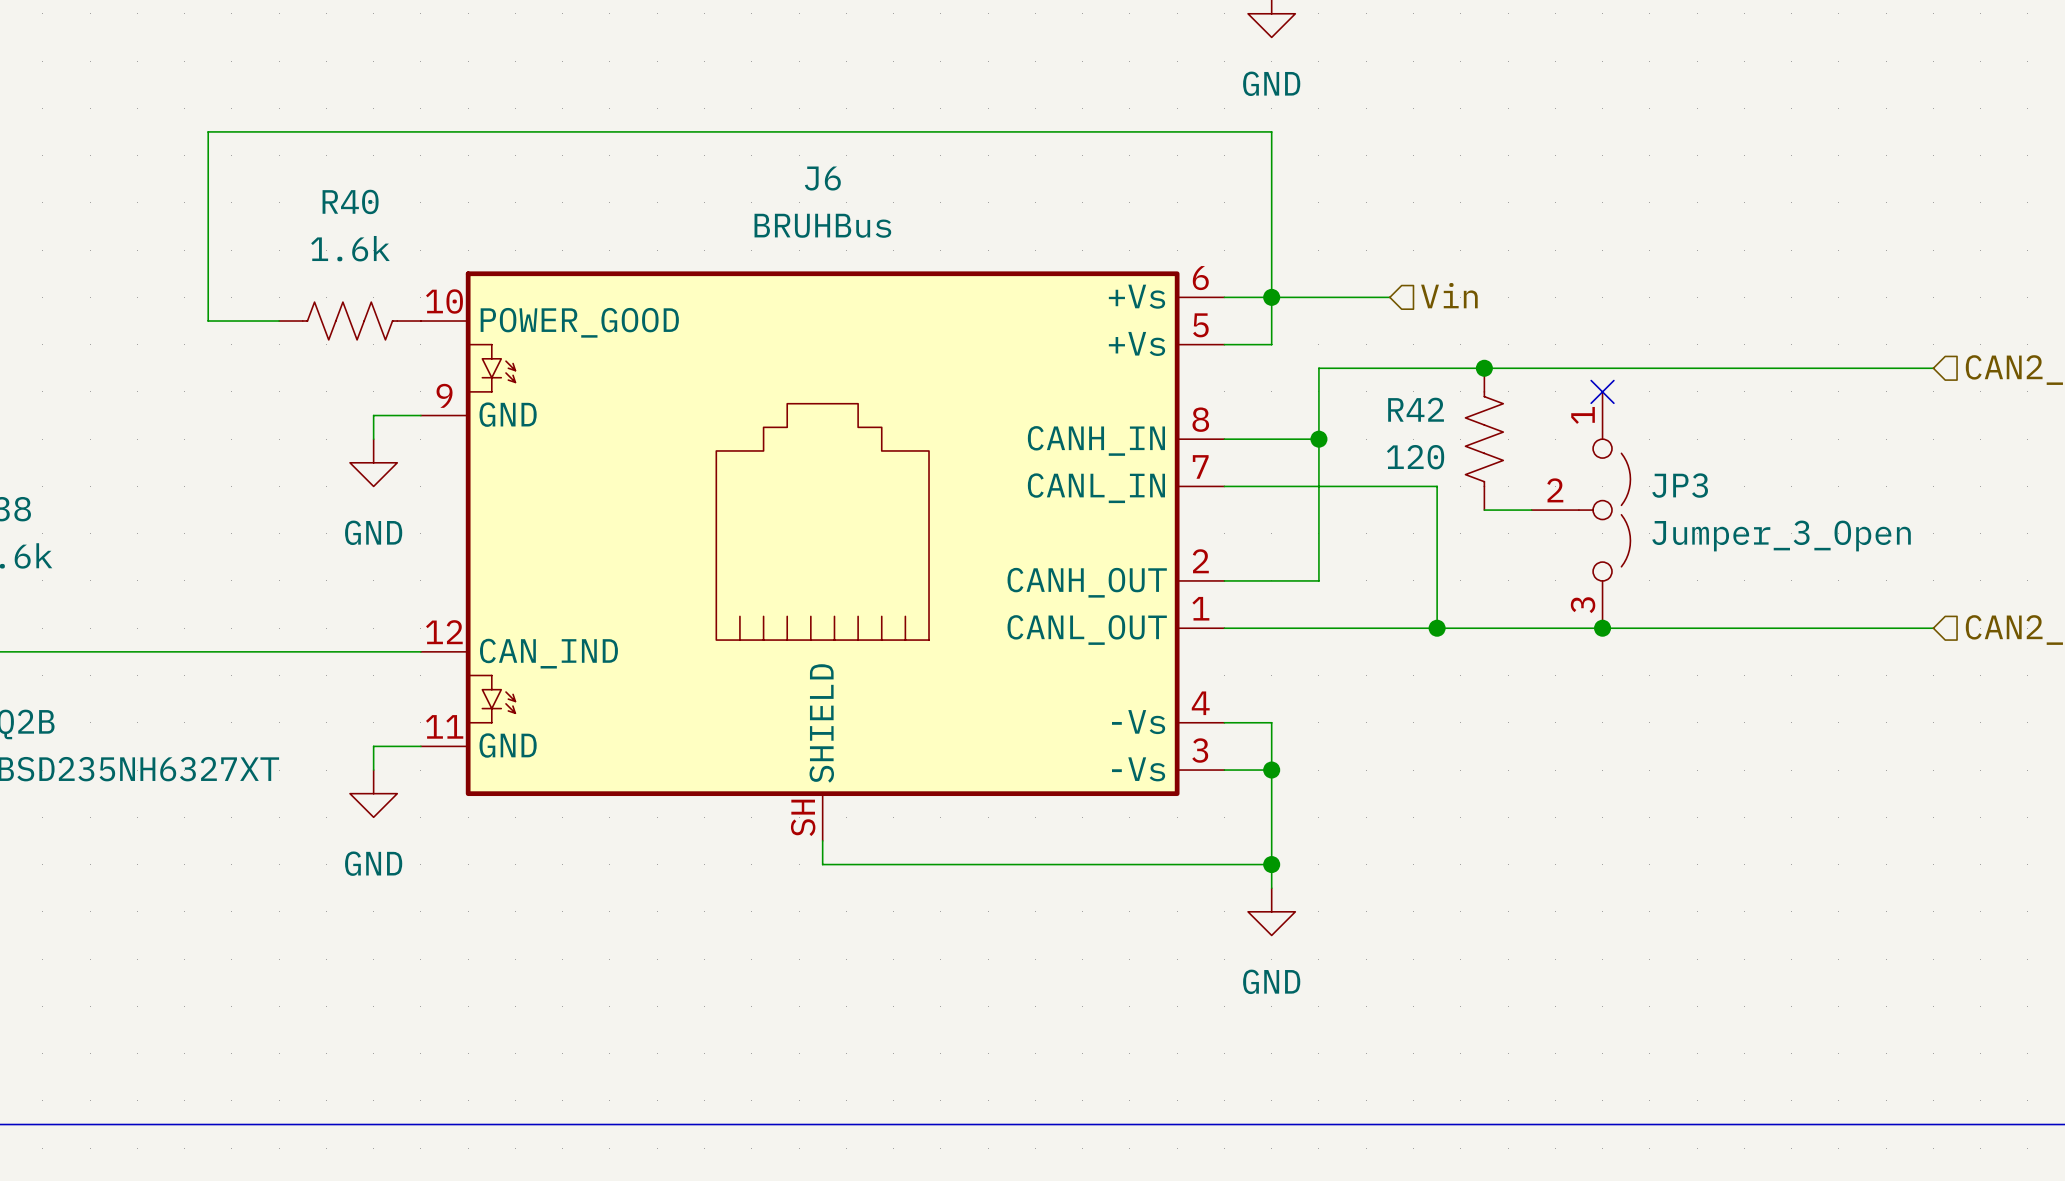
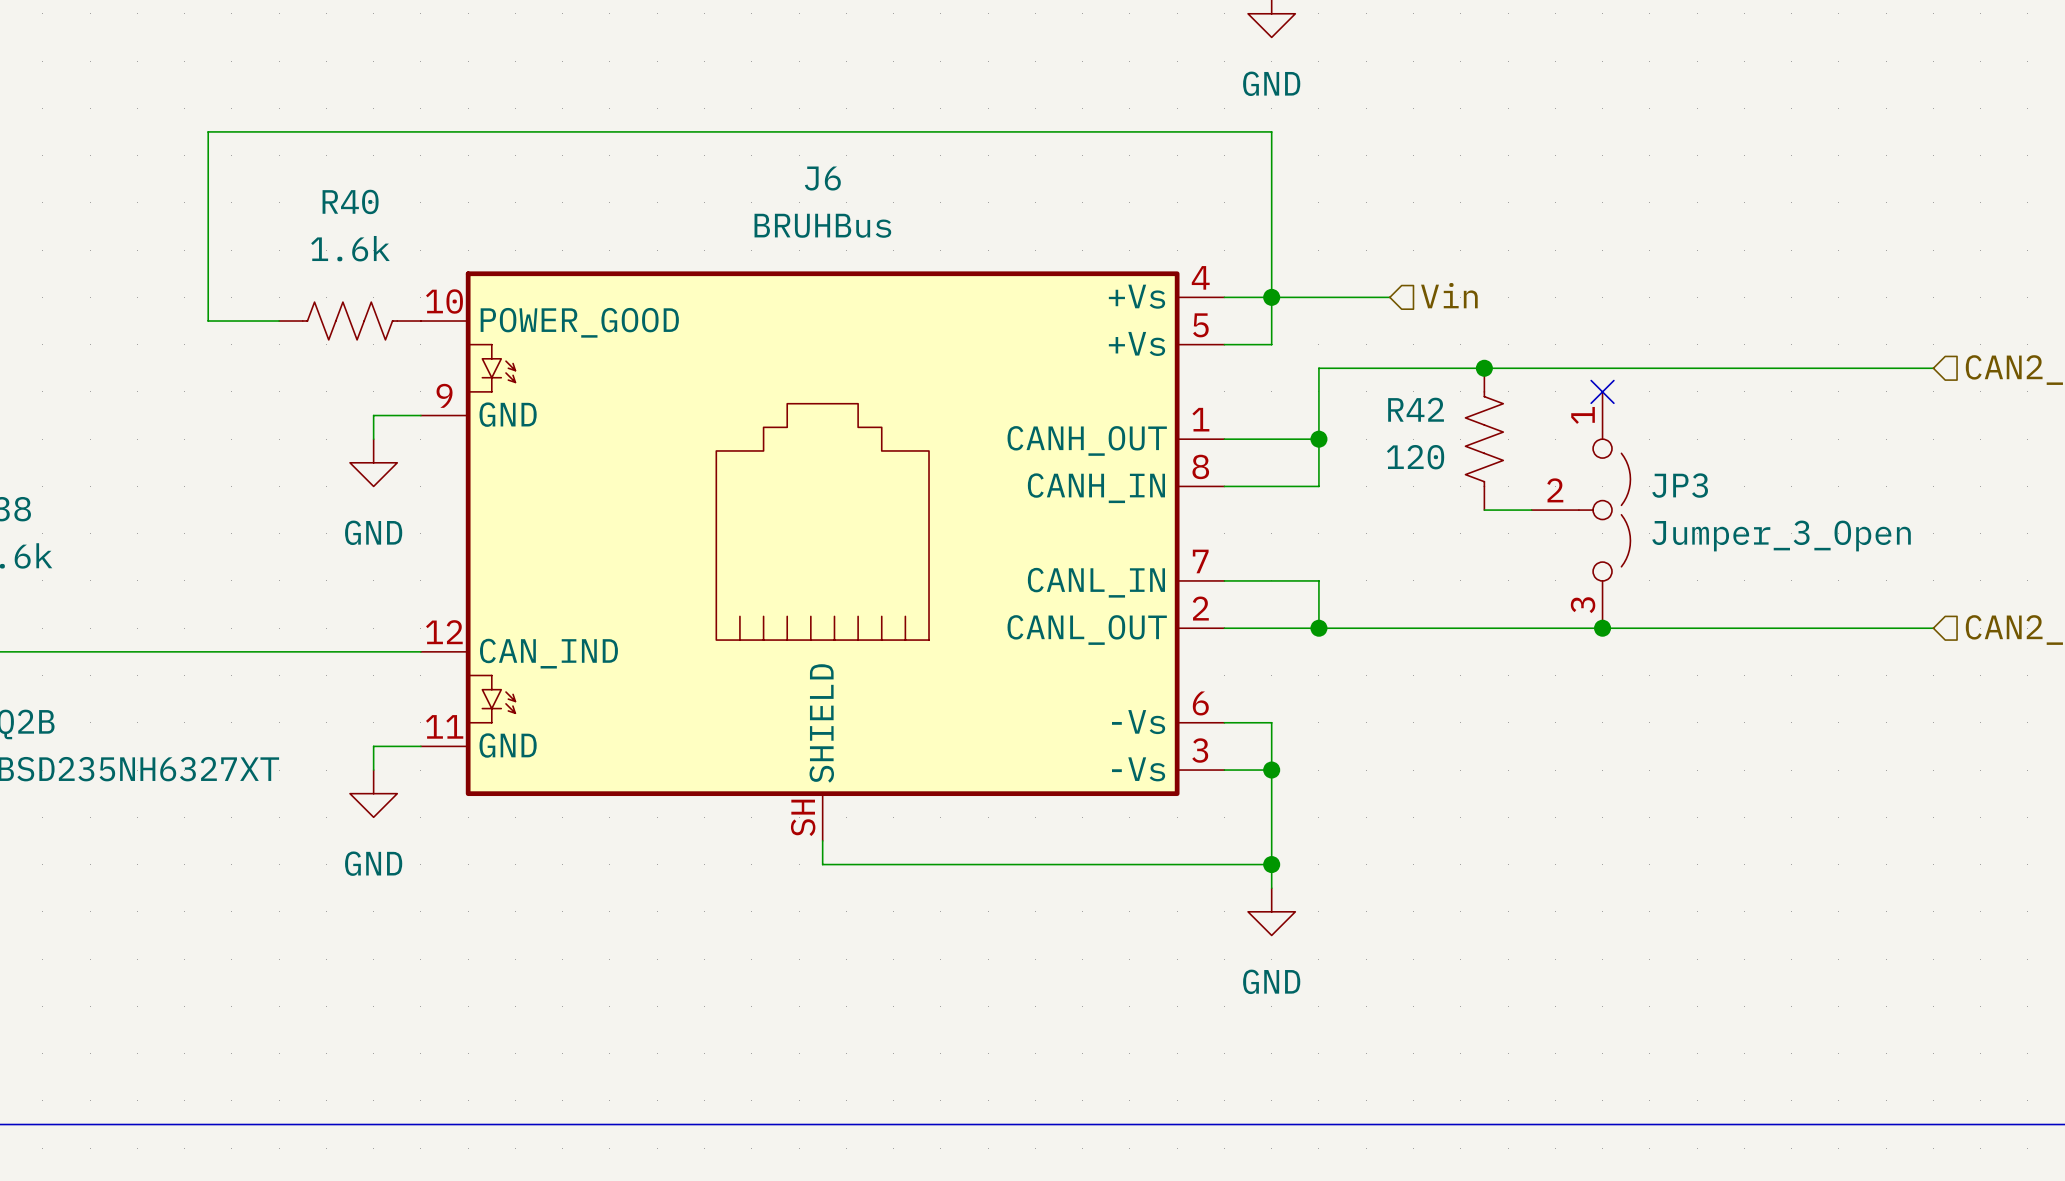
J6 symbol: [420, 271, 1225, 841] -> [420, 271, 1225, 841]
wire: (1318, 580) (1318, 486) (1437, 486) (1437, 628) -> (1318, 580) (1318, 628)
junction: none -> (1318, 628)
junction: (1437, 628) -> none

